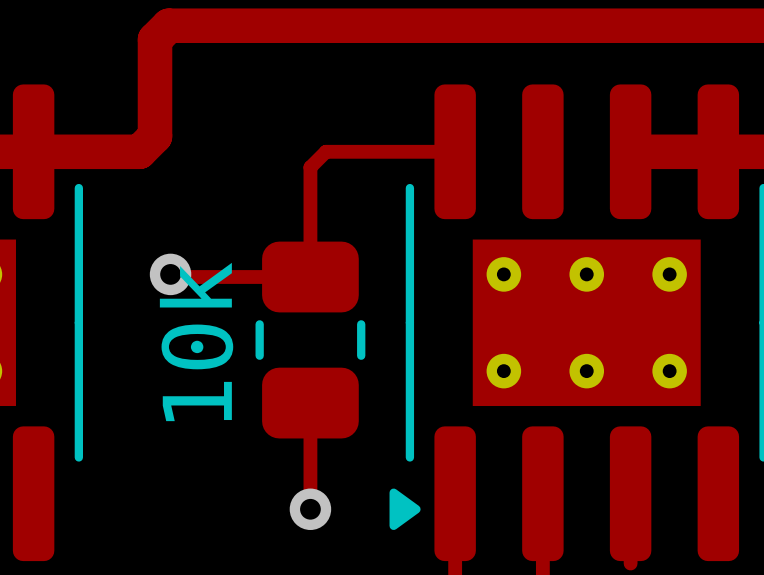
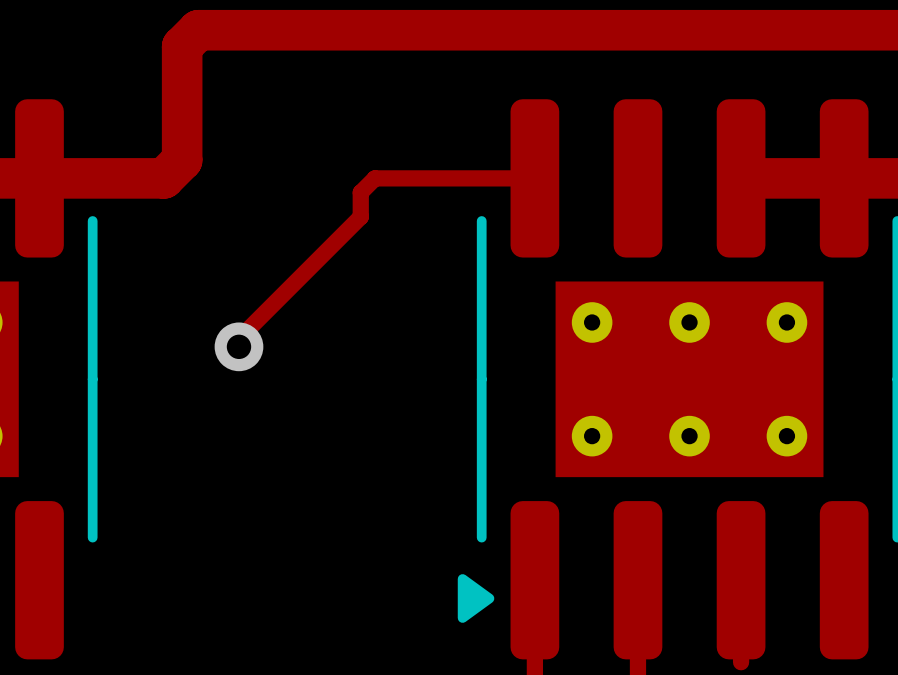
track: (325, 151) (310, 167) (310, 277) (173, 277) (170, 274) -> (383, 178) (374, 178) (360, 192) (360, 216) (238, 338) (238, 346)
via position: (170, 274) -> (238, 346)
part: 10k (310, 340) -> none
track: (310, 403) (310, 509) -> none
via: (310, 509) -> none

